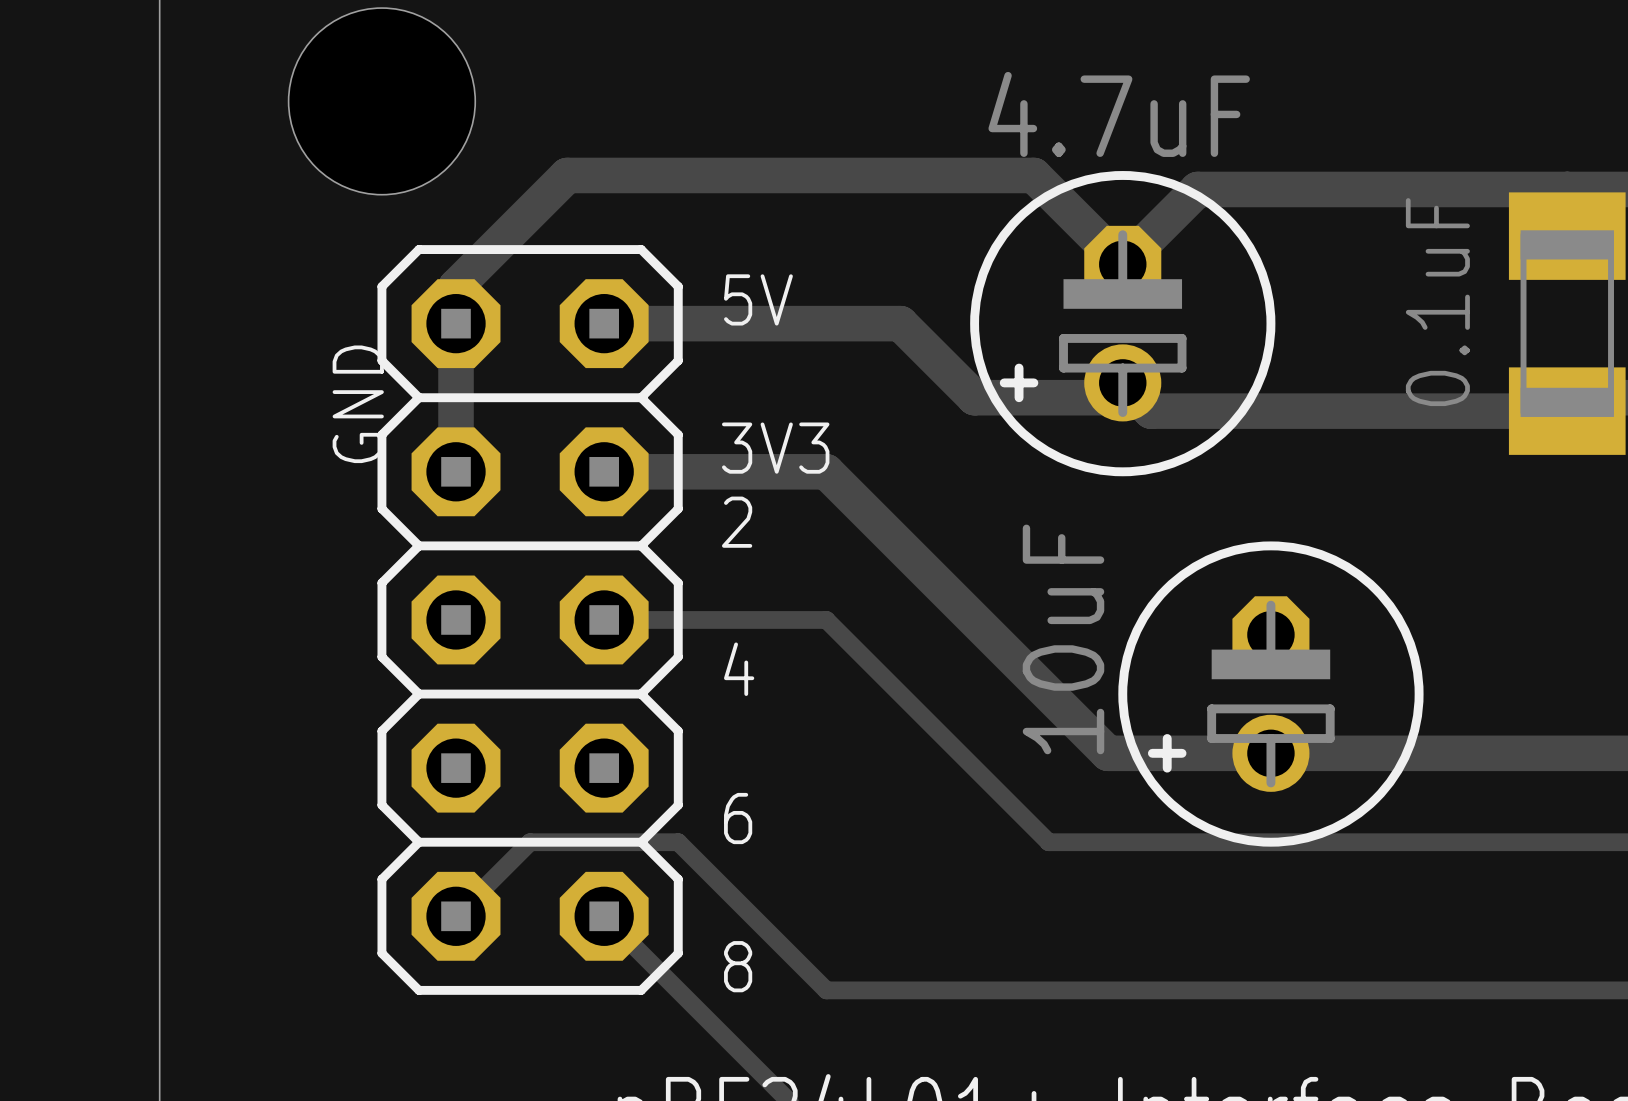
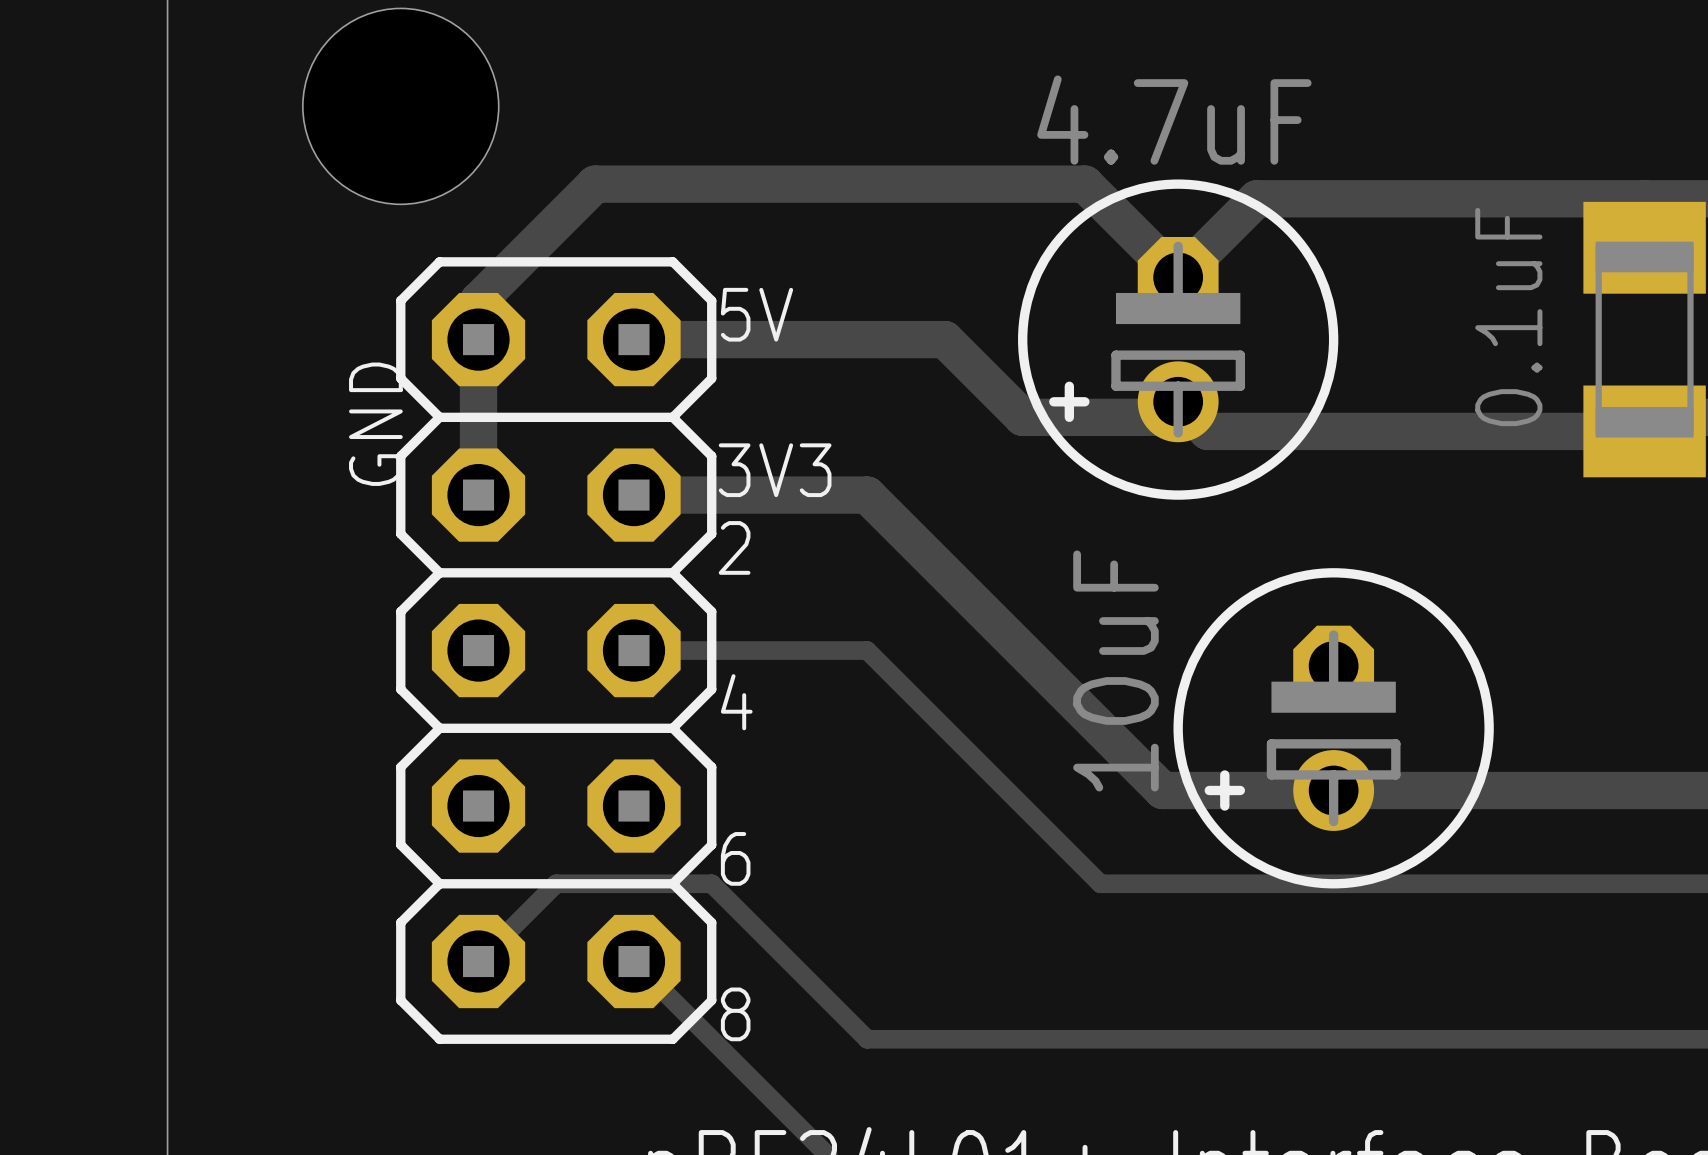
text position: 5V (758, 299) -> 5V (756, 314)
text position: 3V3 (775, 448) -> 3V3 (775, 470)
text position: 2 (737, 522) -> 2 (734, 547)
text position: 4 (739, 669) -> 4 (736, 702)
text position: 6 (738, 818) -> 6 (735, 858)
text position: 8 (738, 966) -> 8 (735, 1014)

